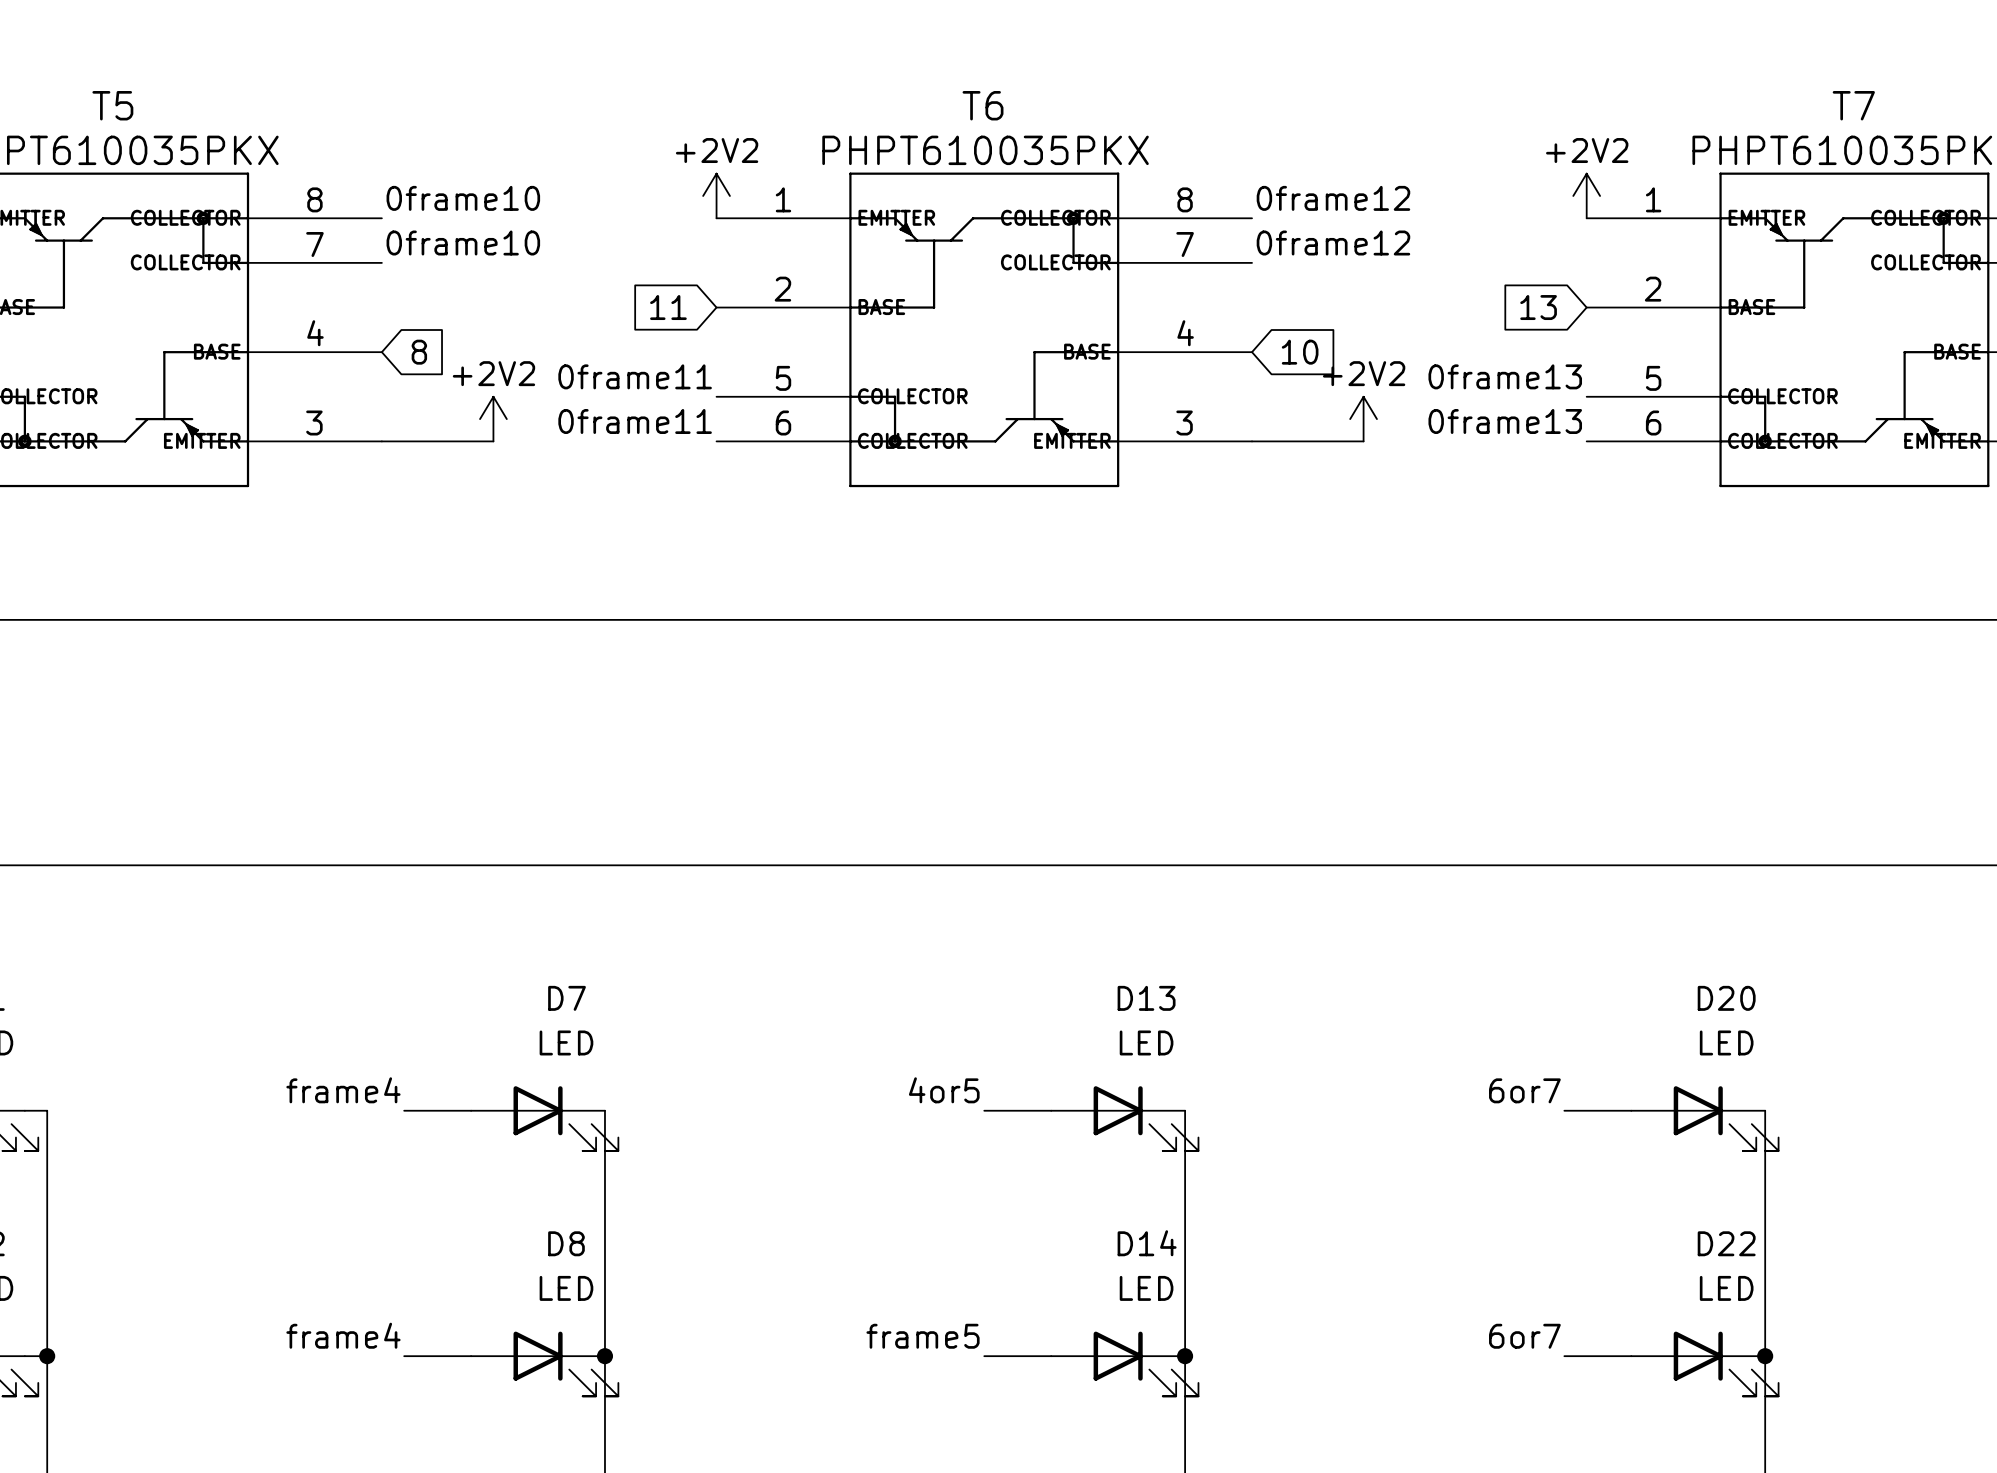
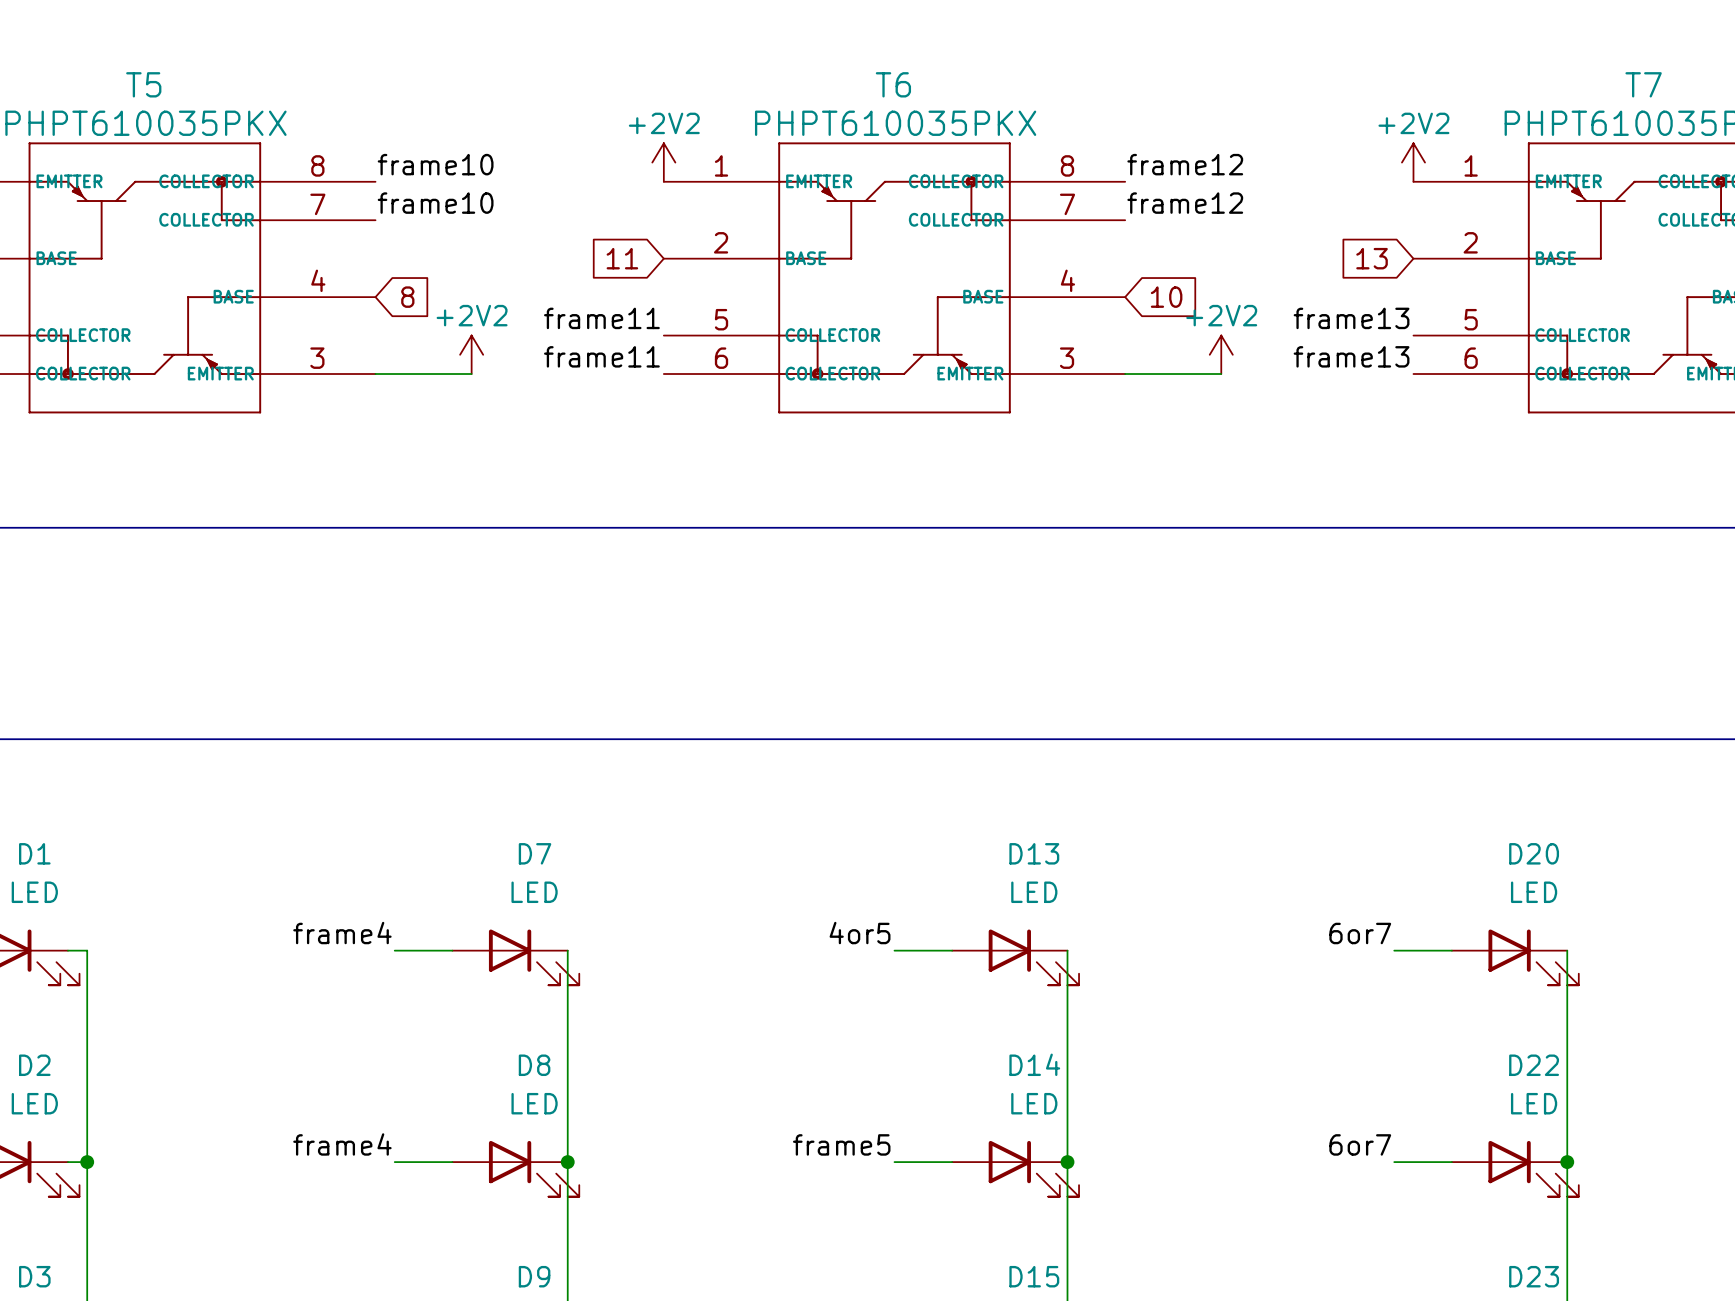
label: 0frame10 (463, 198) -> frame10 (435, 164)
label: 0frame12 (1333, 198) -> frame12 (1185, 164)
label: 0frame10 (463, 243) -> frame10 (435, 203)
label: 0frame12 (1333, 243) -> frame12 (1185, 203)
label: 0frame11 (635, 376) -> frame11 (601, 318)
label: 0frame13 (1505, 376) -> frame13 (1351, 318)
label: 0frame11 (635, 421) -> frame11 (601, 356)
label: 0frame13 (1505, 421) -> frame13 (1351, 356)

